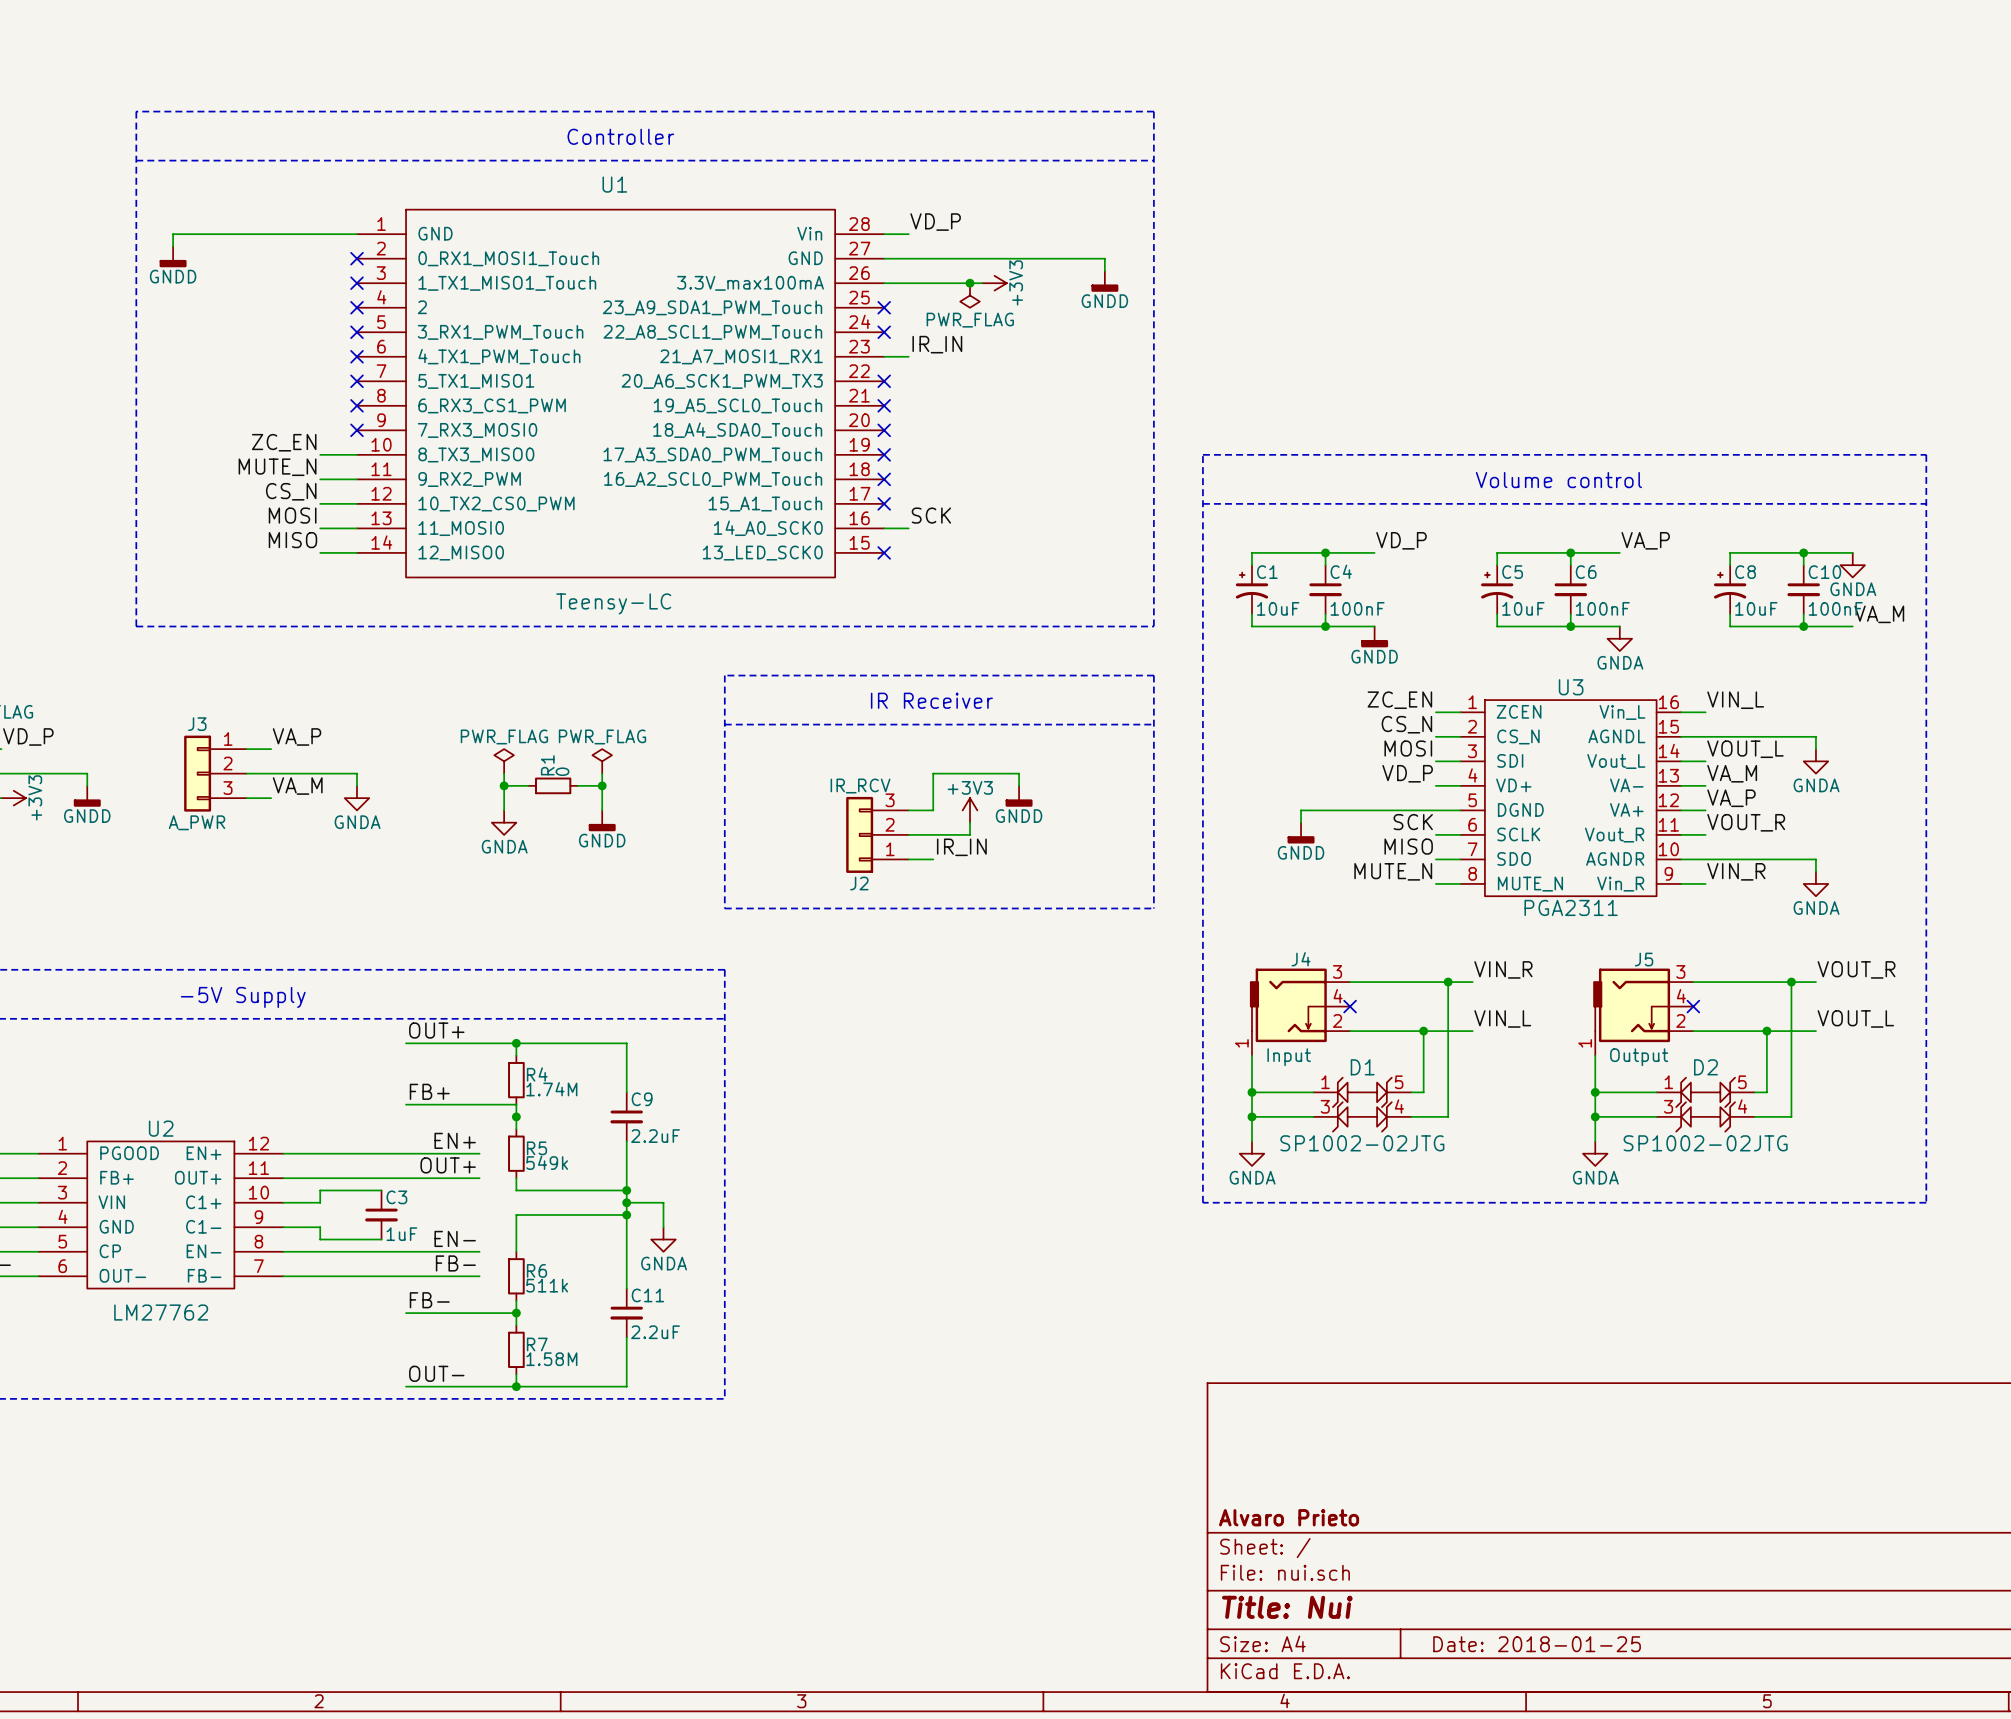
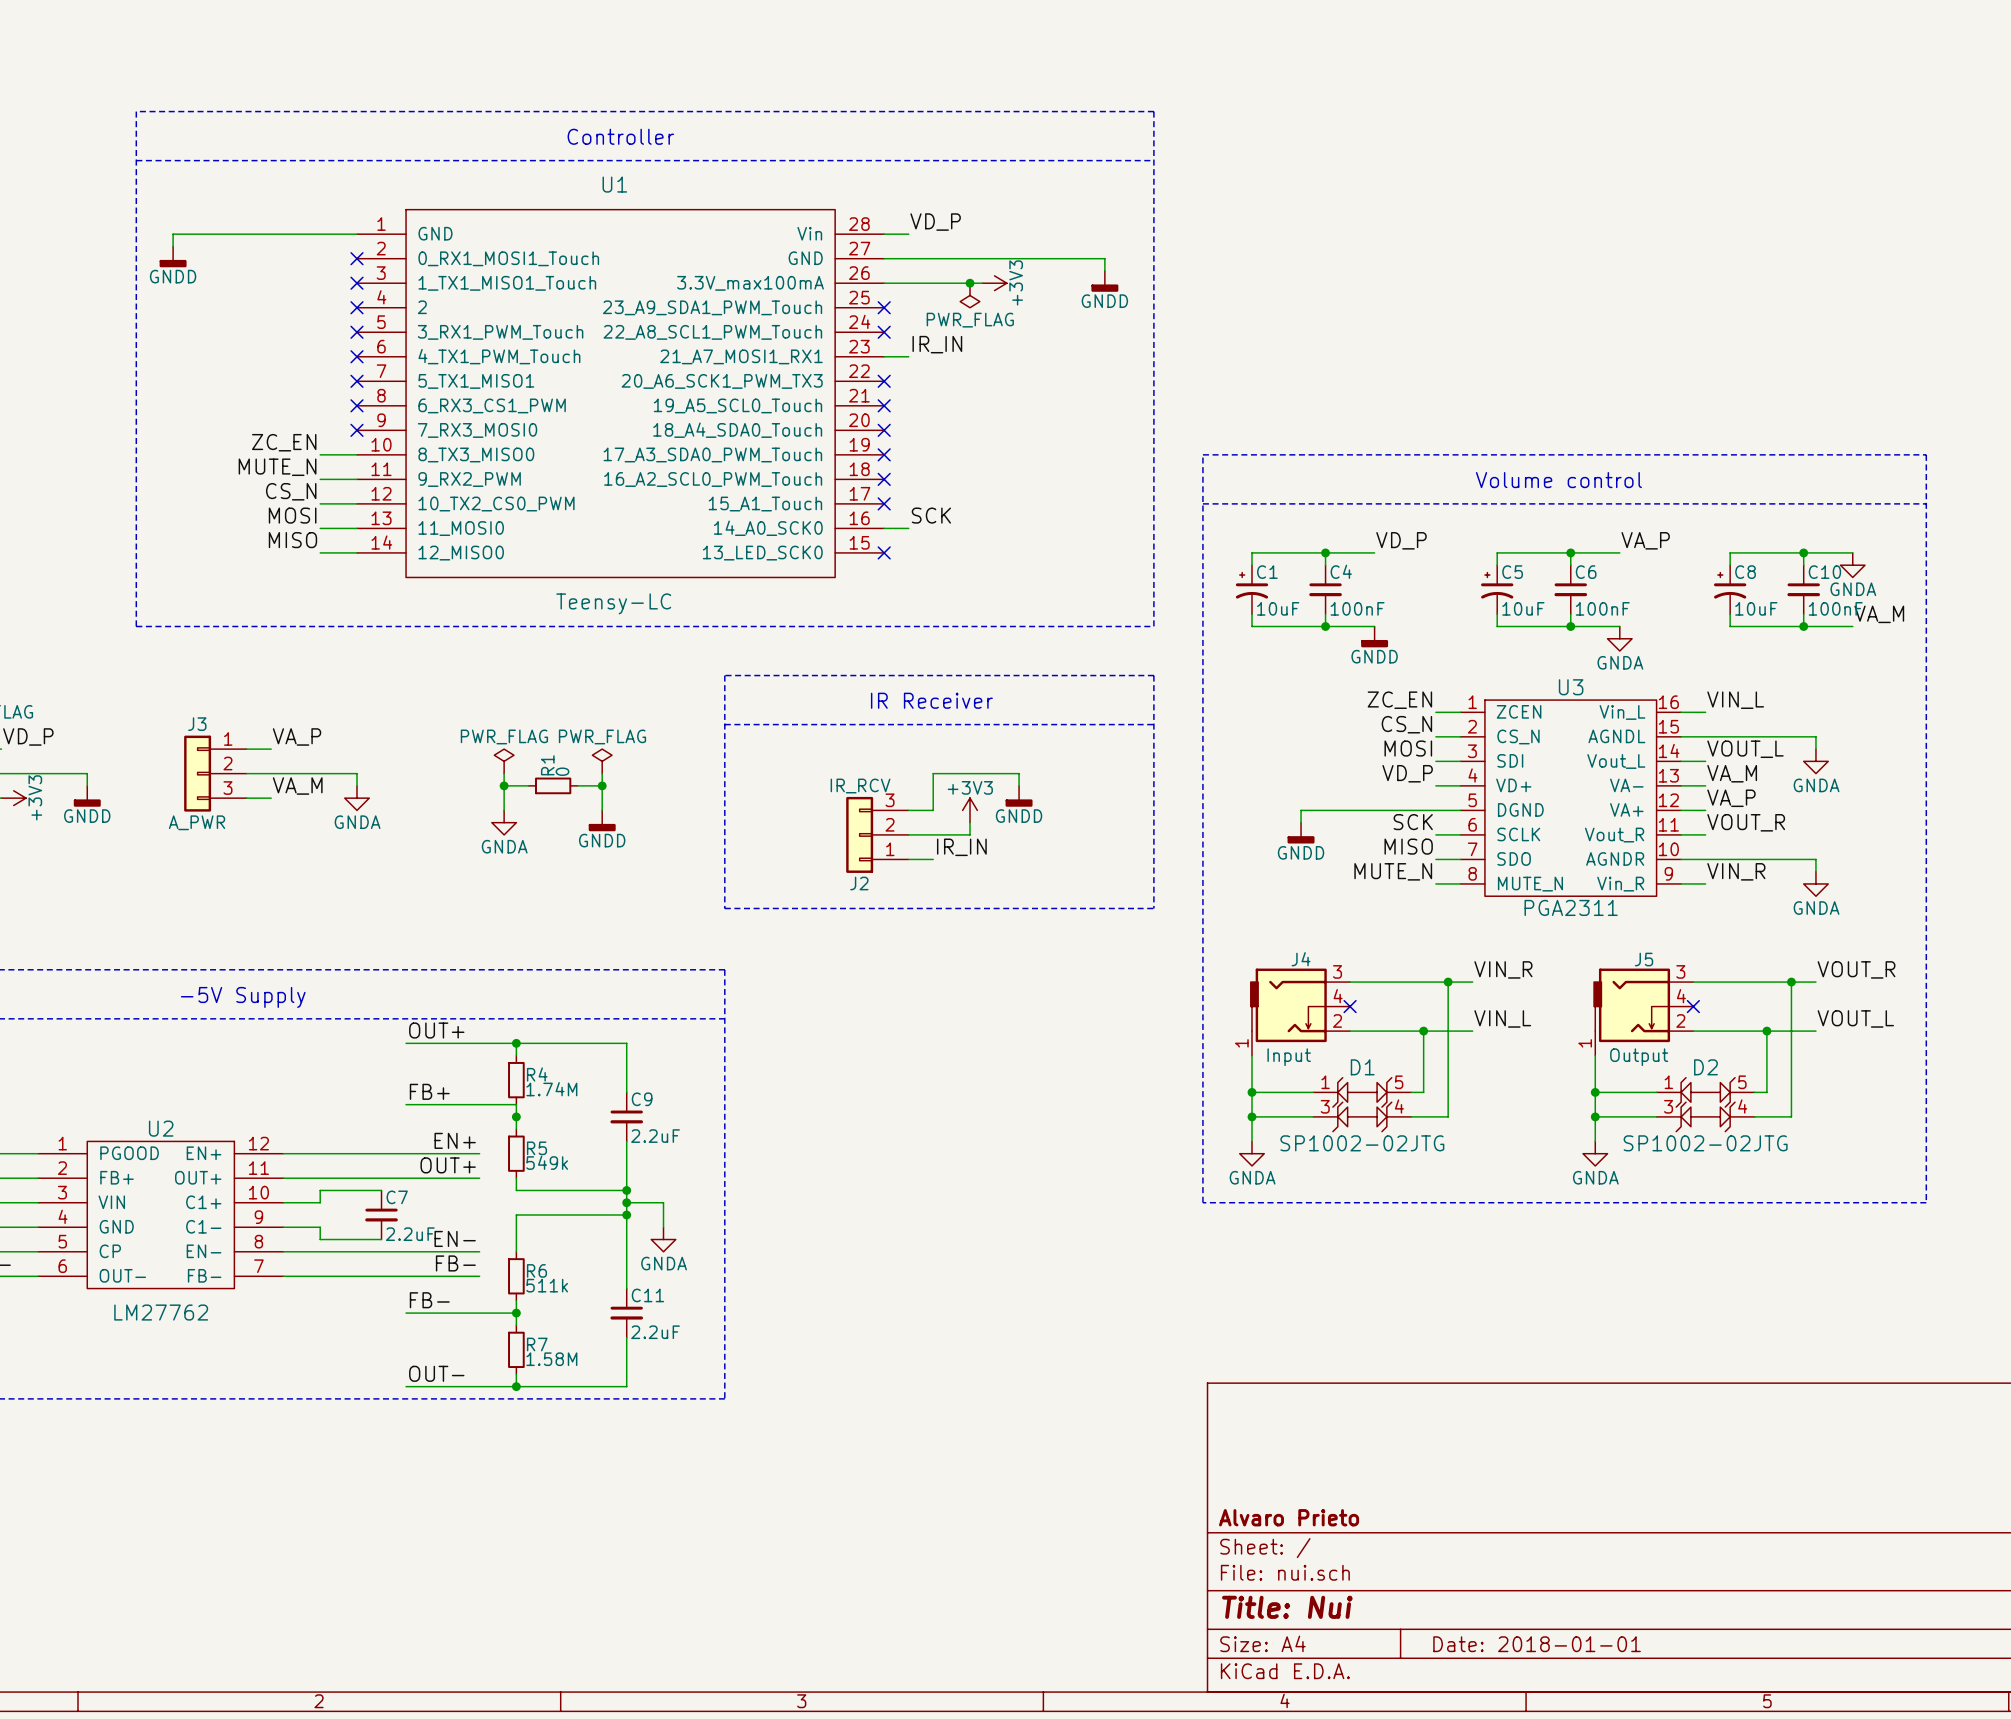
C3 name: C3 (396, 1197) -> C7 (397, 1197)
C3 value: 1uF (401, 1234) -> 2.2uF (410, 1234)
title block: Date: 2018-01-25 (1537, 1644) -> Date: 2018-01-01 (1537, 1644)

